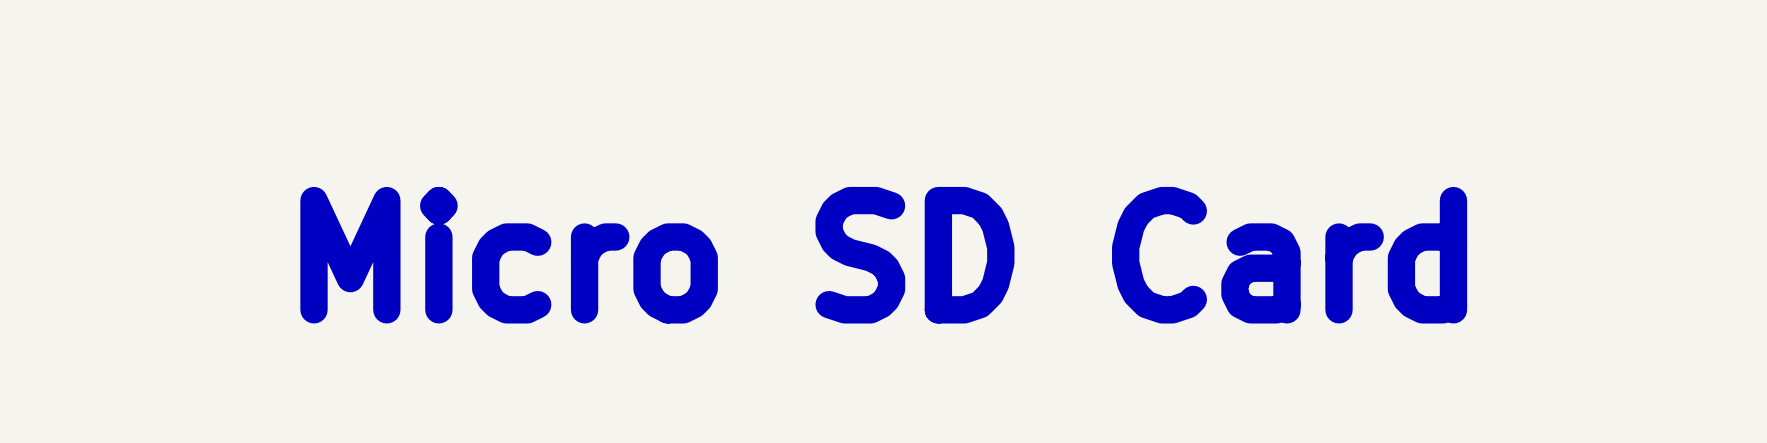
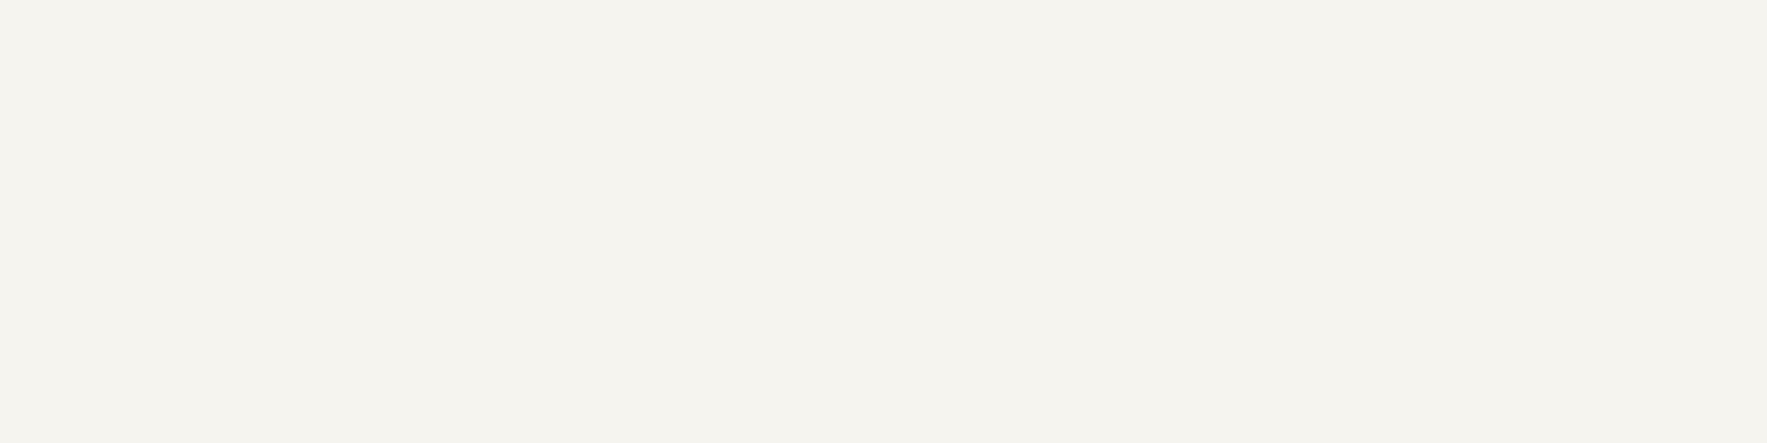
text: Micro SD Card (883, 255) -> none

